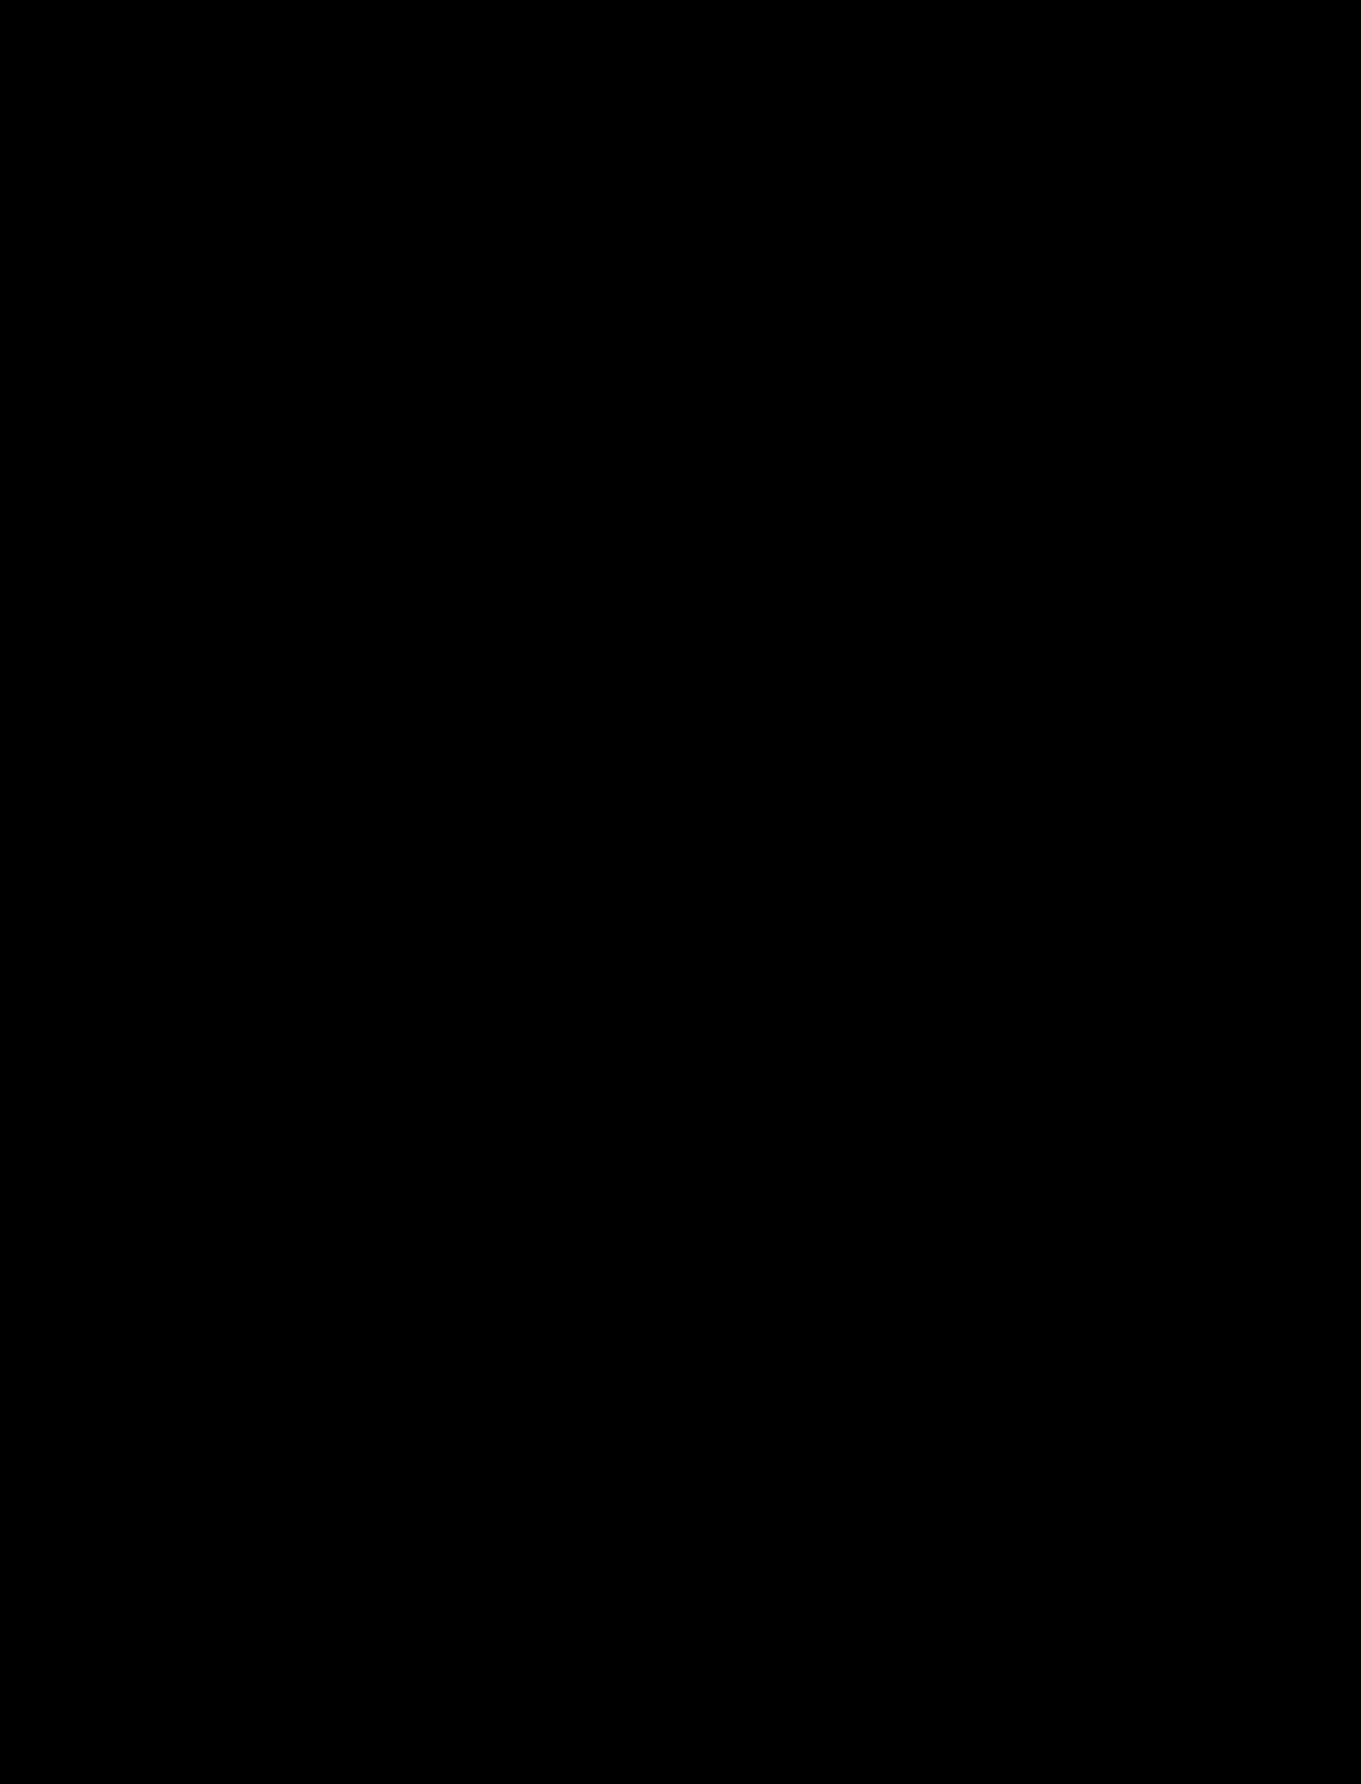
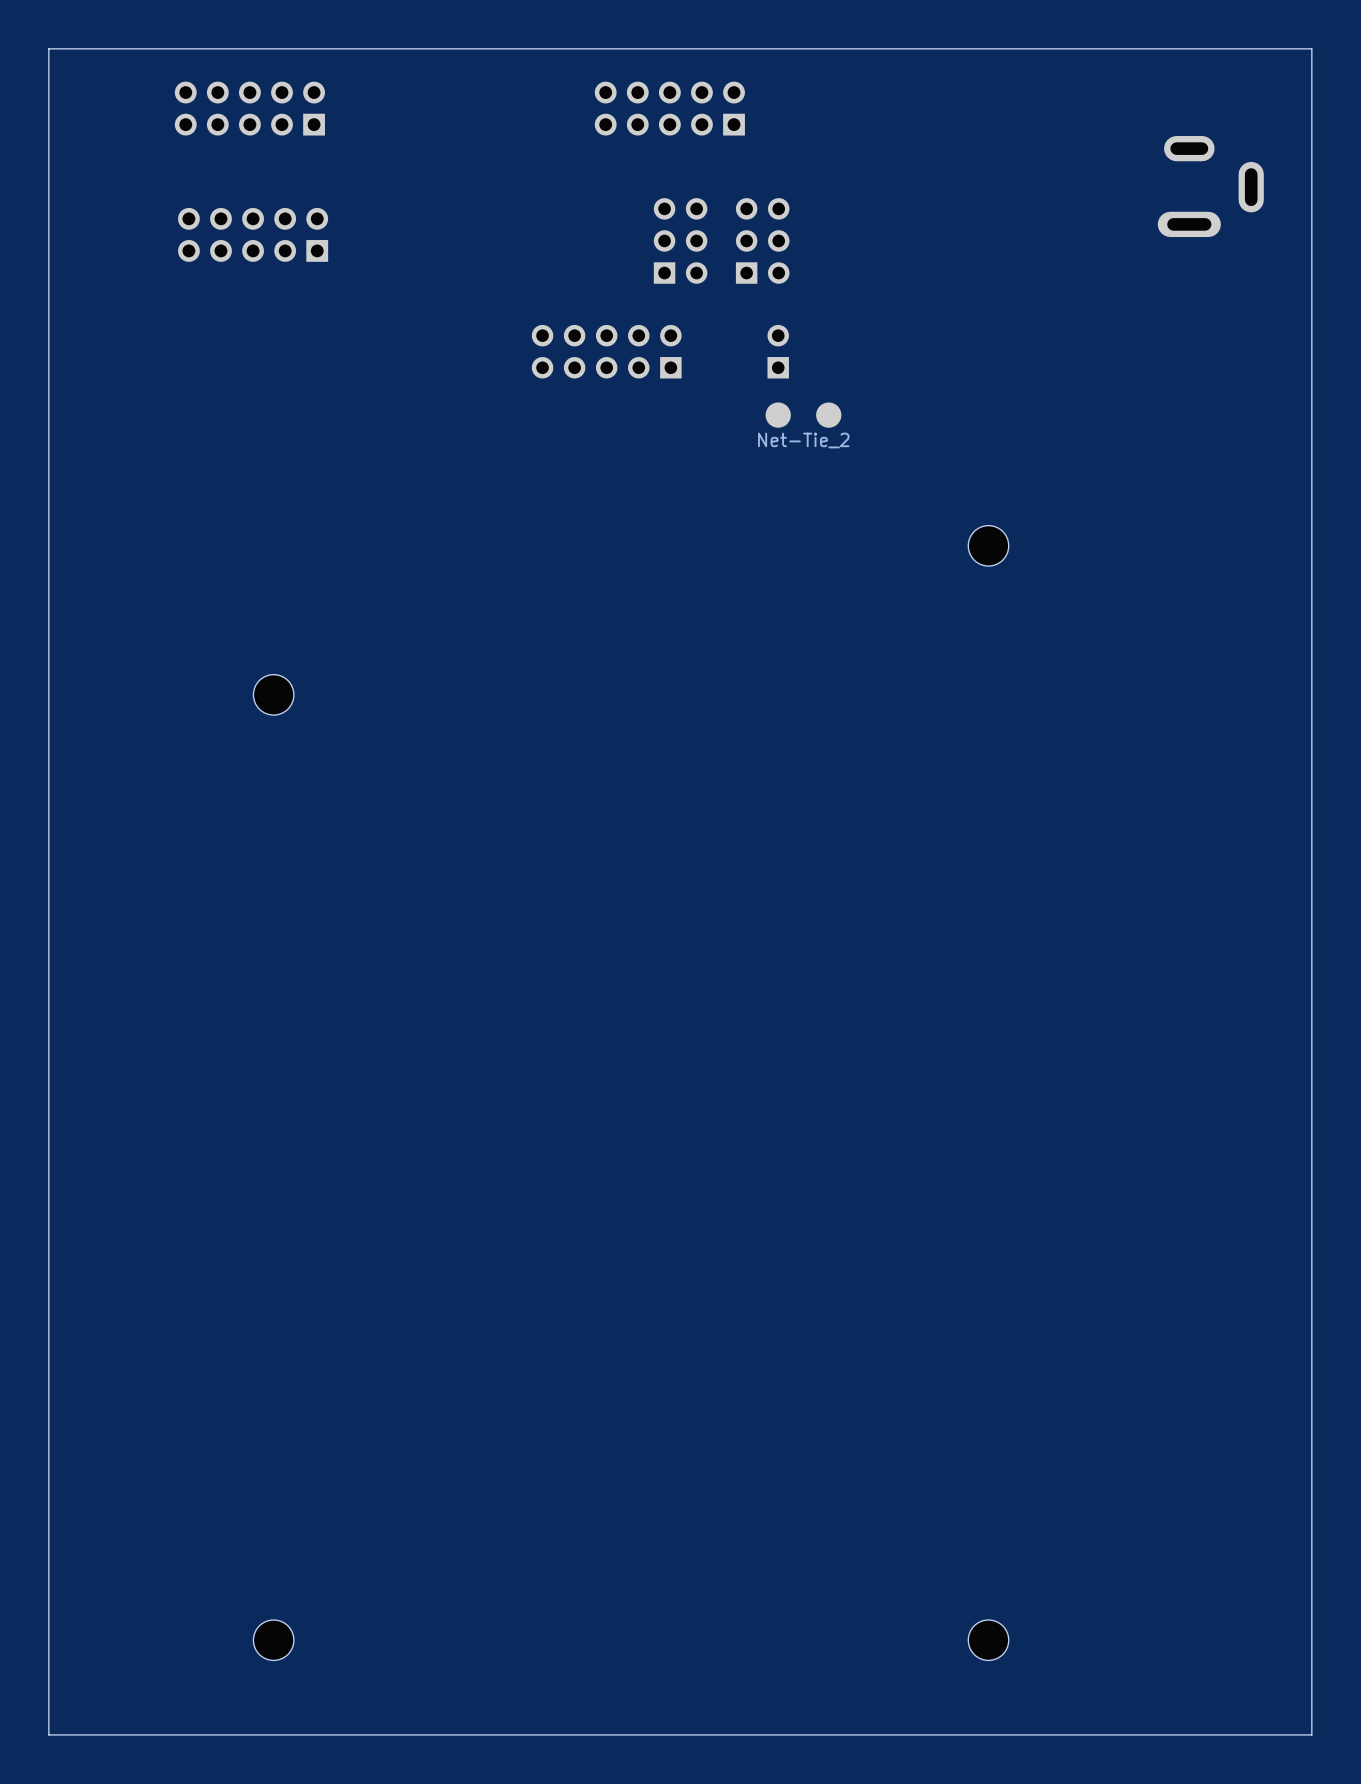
board edge: none -> (1311, 48) (1311, 1734) (48, 1734) (48, 48) (1311, 48)
part: none -> (249, 108)
part: none -> (669, 108)
part: none -> (1210, 186)
part: none -> (253, 234)
part: none -> (680, 240)
part: none -> (762, 240)
part: none -> (606, 351)
part: none -> (778, 351)
part: none -> Net-Tie_2 (803, 415)
part: none -> (988, 545)
part: none -> (273, 694)
part: none -> (273, 1640)
part: none -> (988, 1640)

